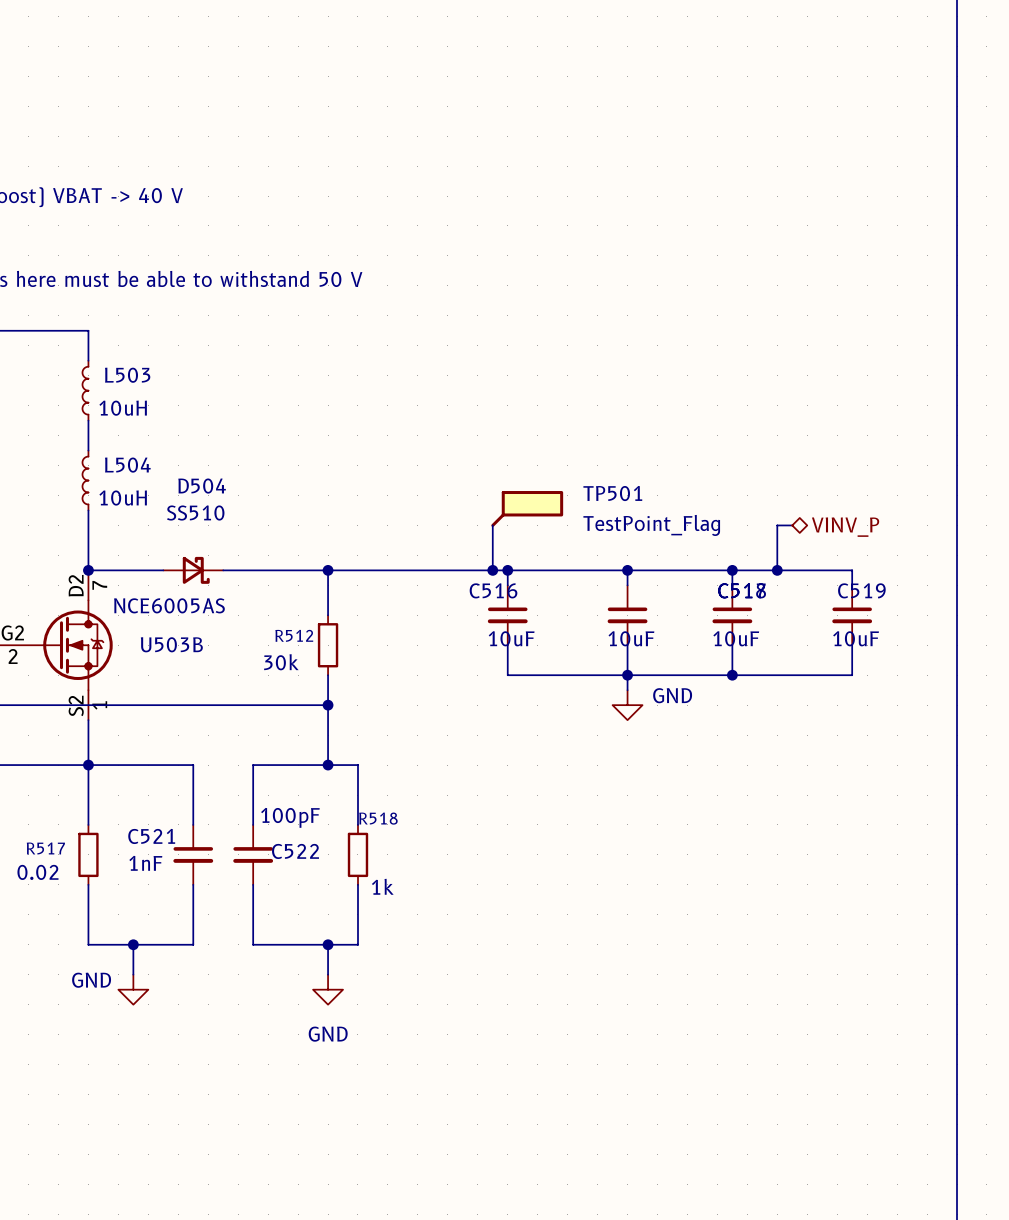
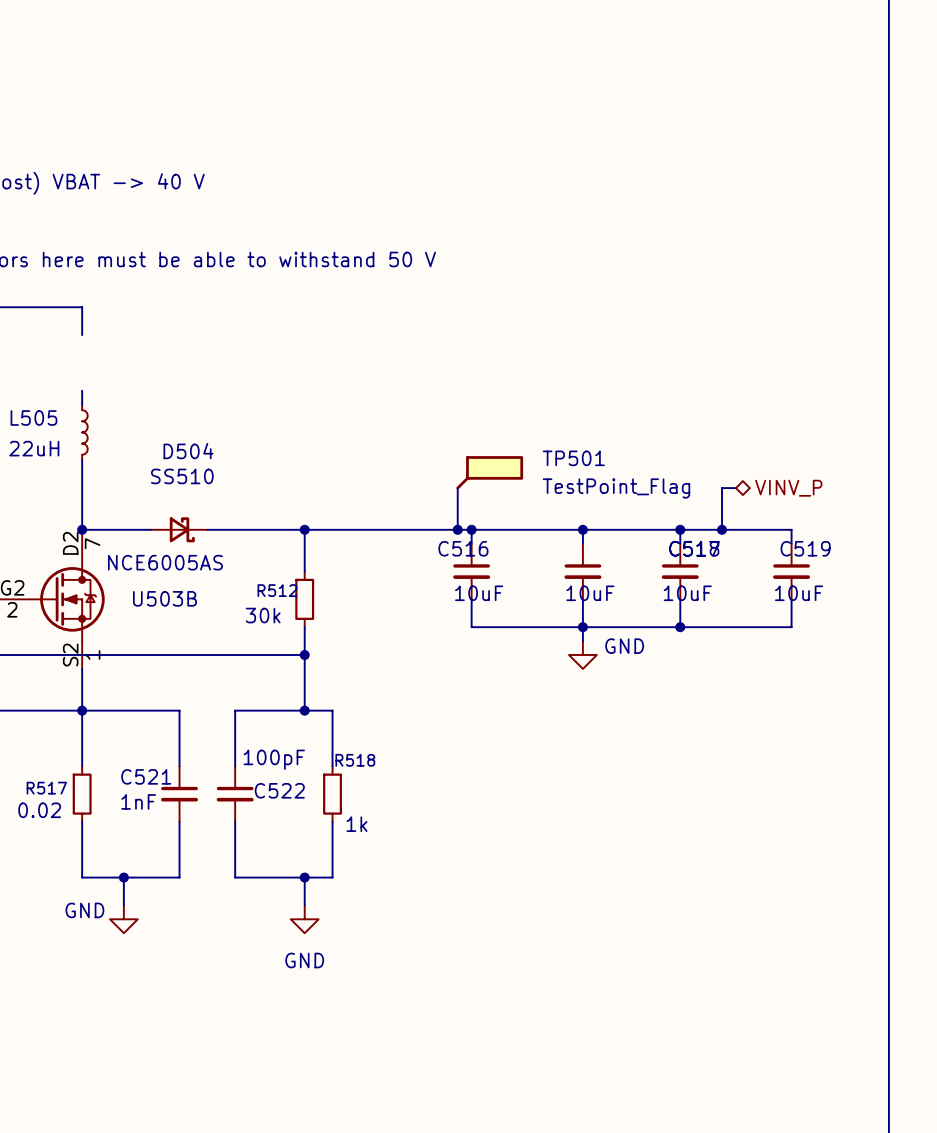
L503: 10uH (85, 390) -> none
wire: (88, 435) (88, 450) -> (82, 460) (82, 474)
L505: none -> 22uH (84, 432)
L504: 10uH (85, 480) -> none

